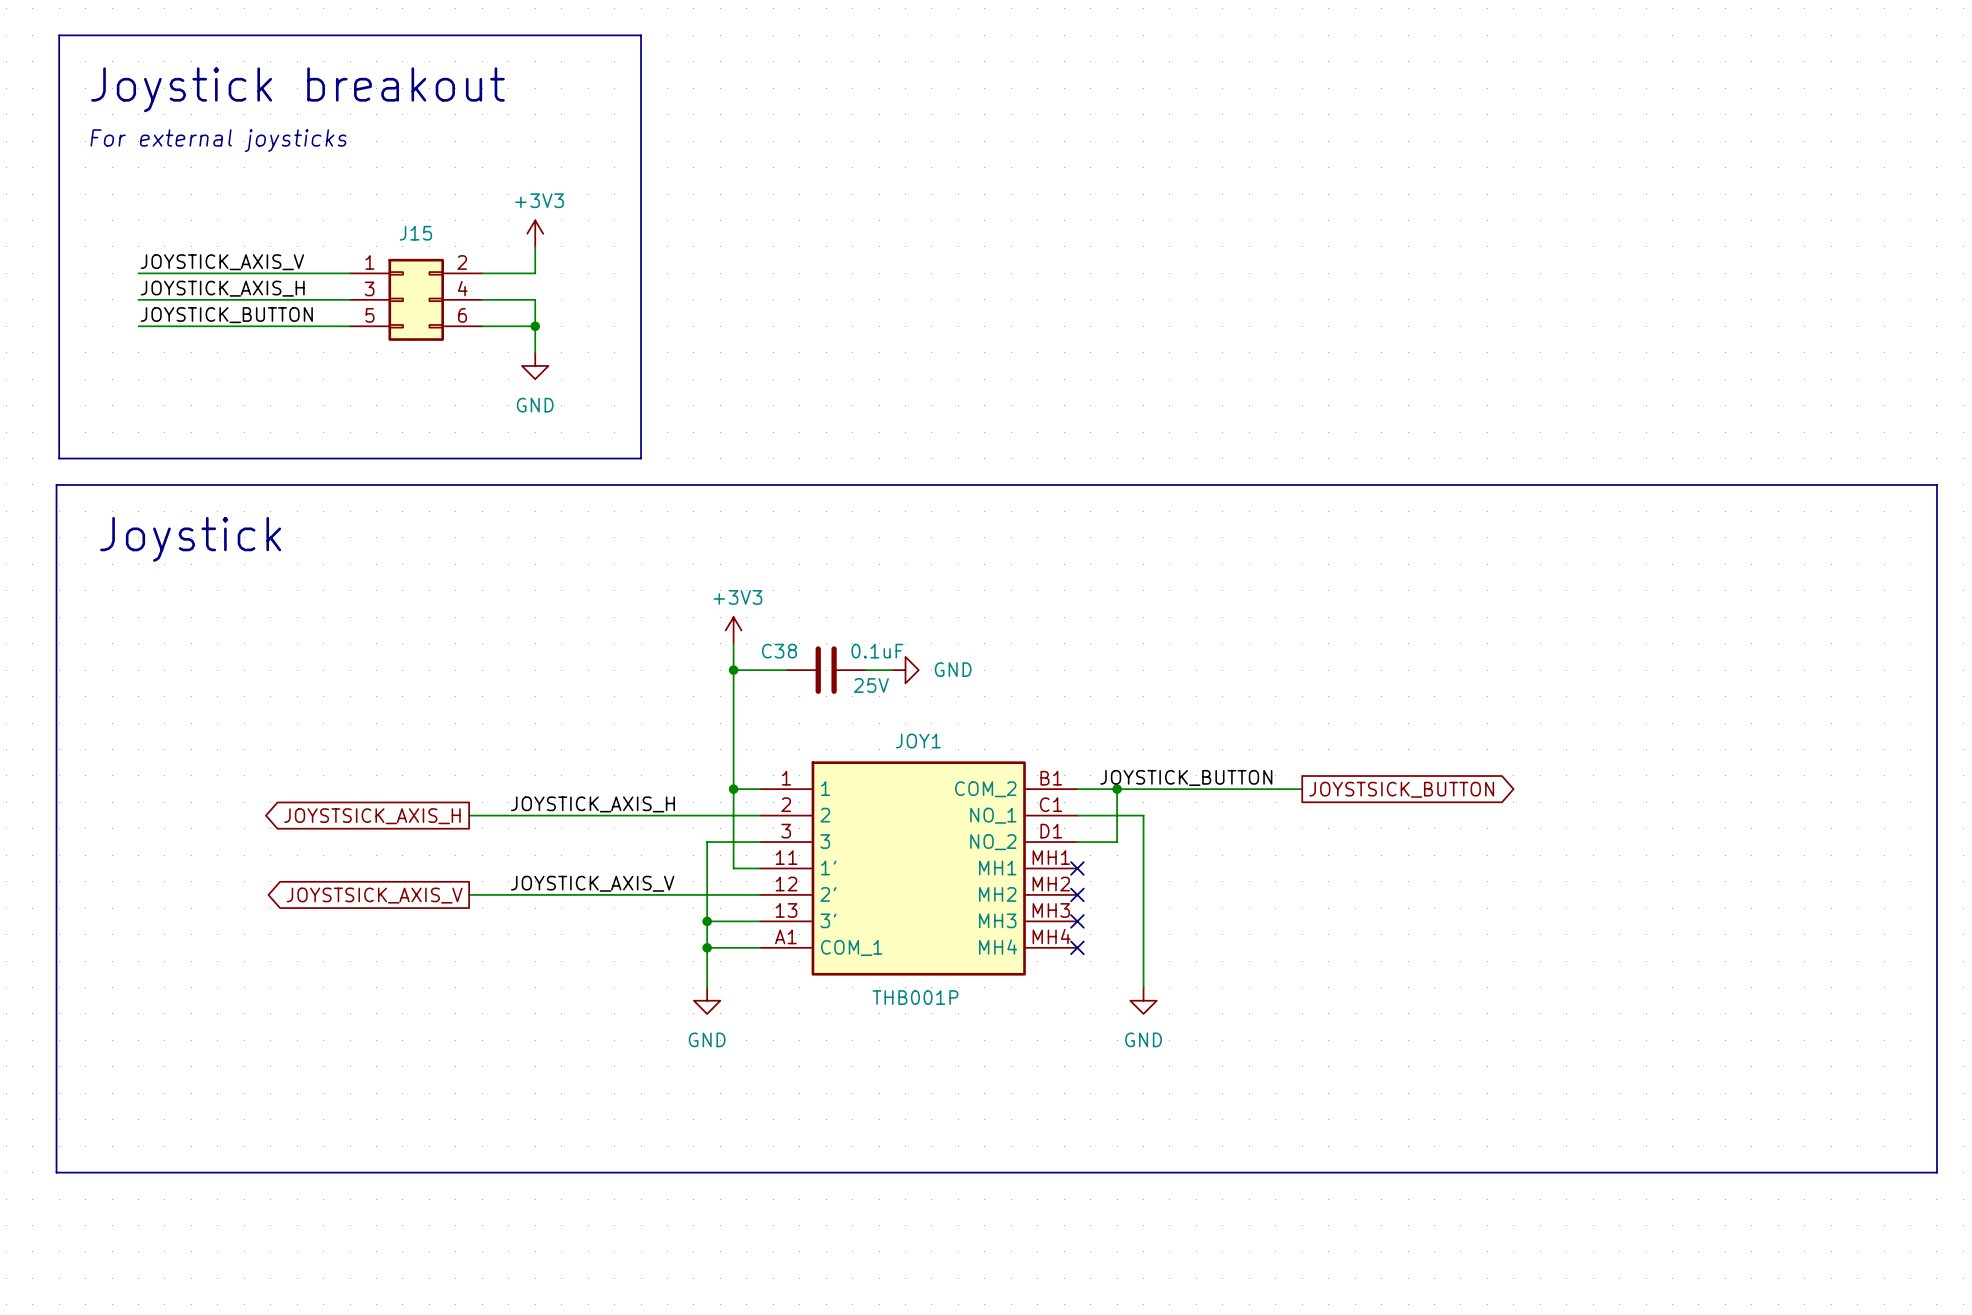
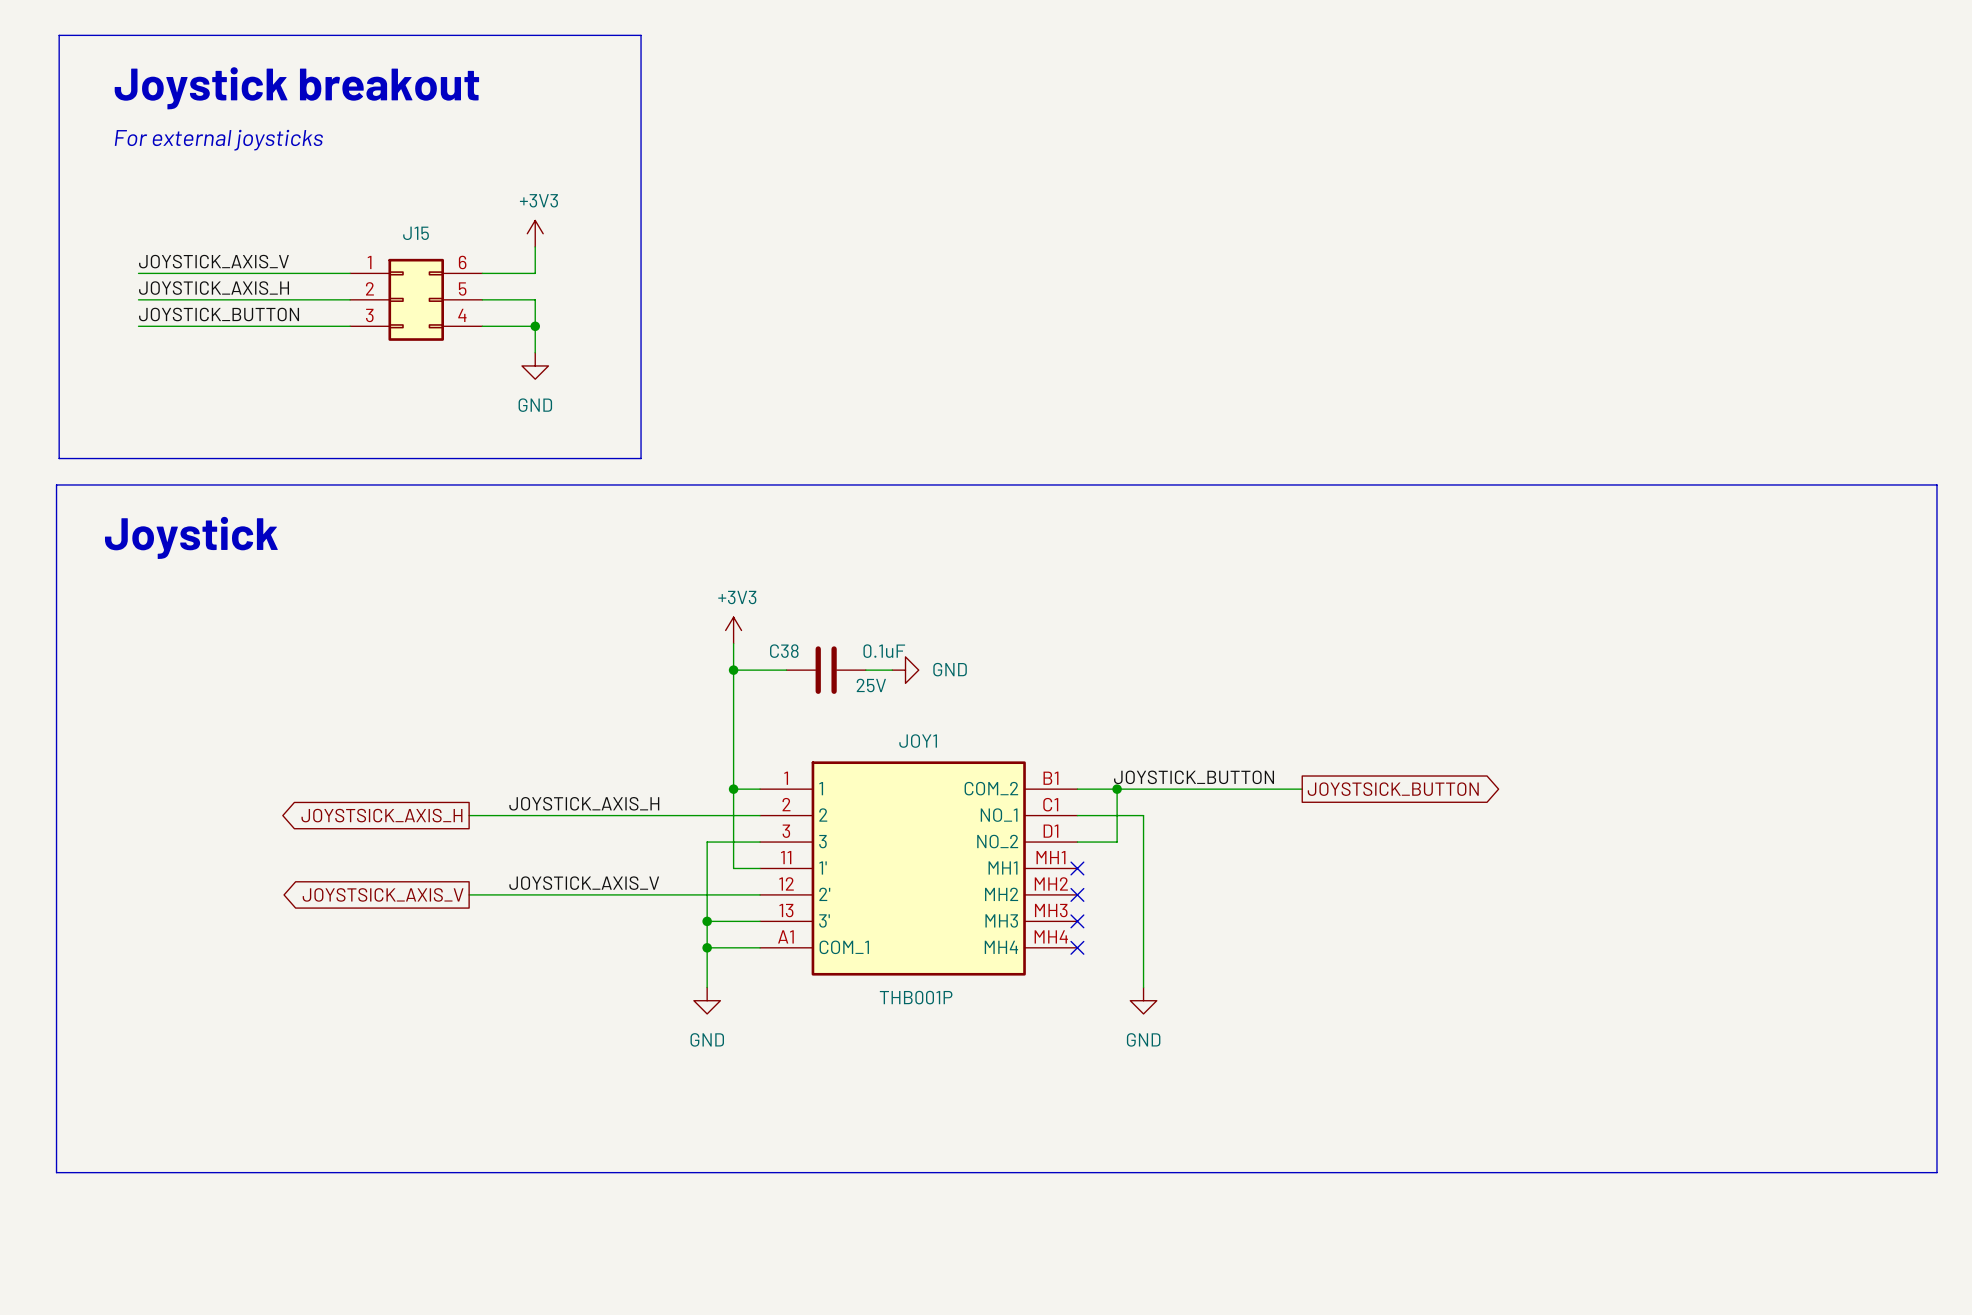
J15 pin number: 2 (462, 262) -> 6 (462, 262)
J15 pin number: 3 (369, 288) -> 2 (369, 288)
J15 pin number: 4 (462, 288) -> 5 (462, 289)
J15 pin number: 5 (369, 315) -> 3 (369, 315)
J15 pin number: 6 (462, 315) -> 4 (462, 315)

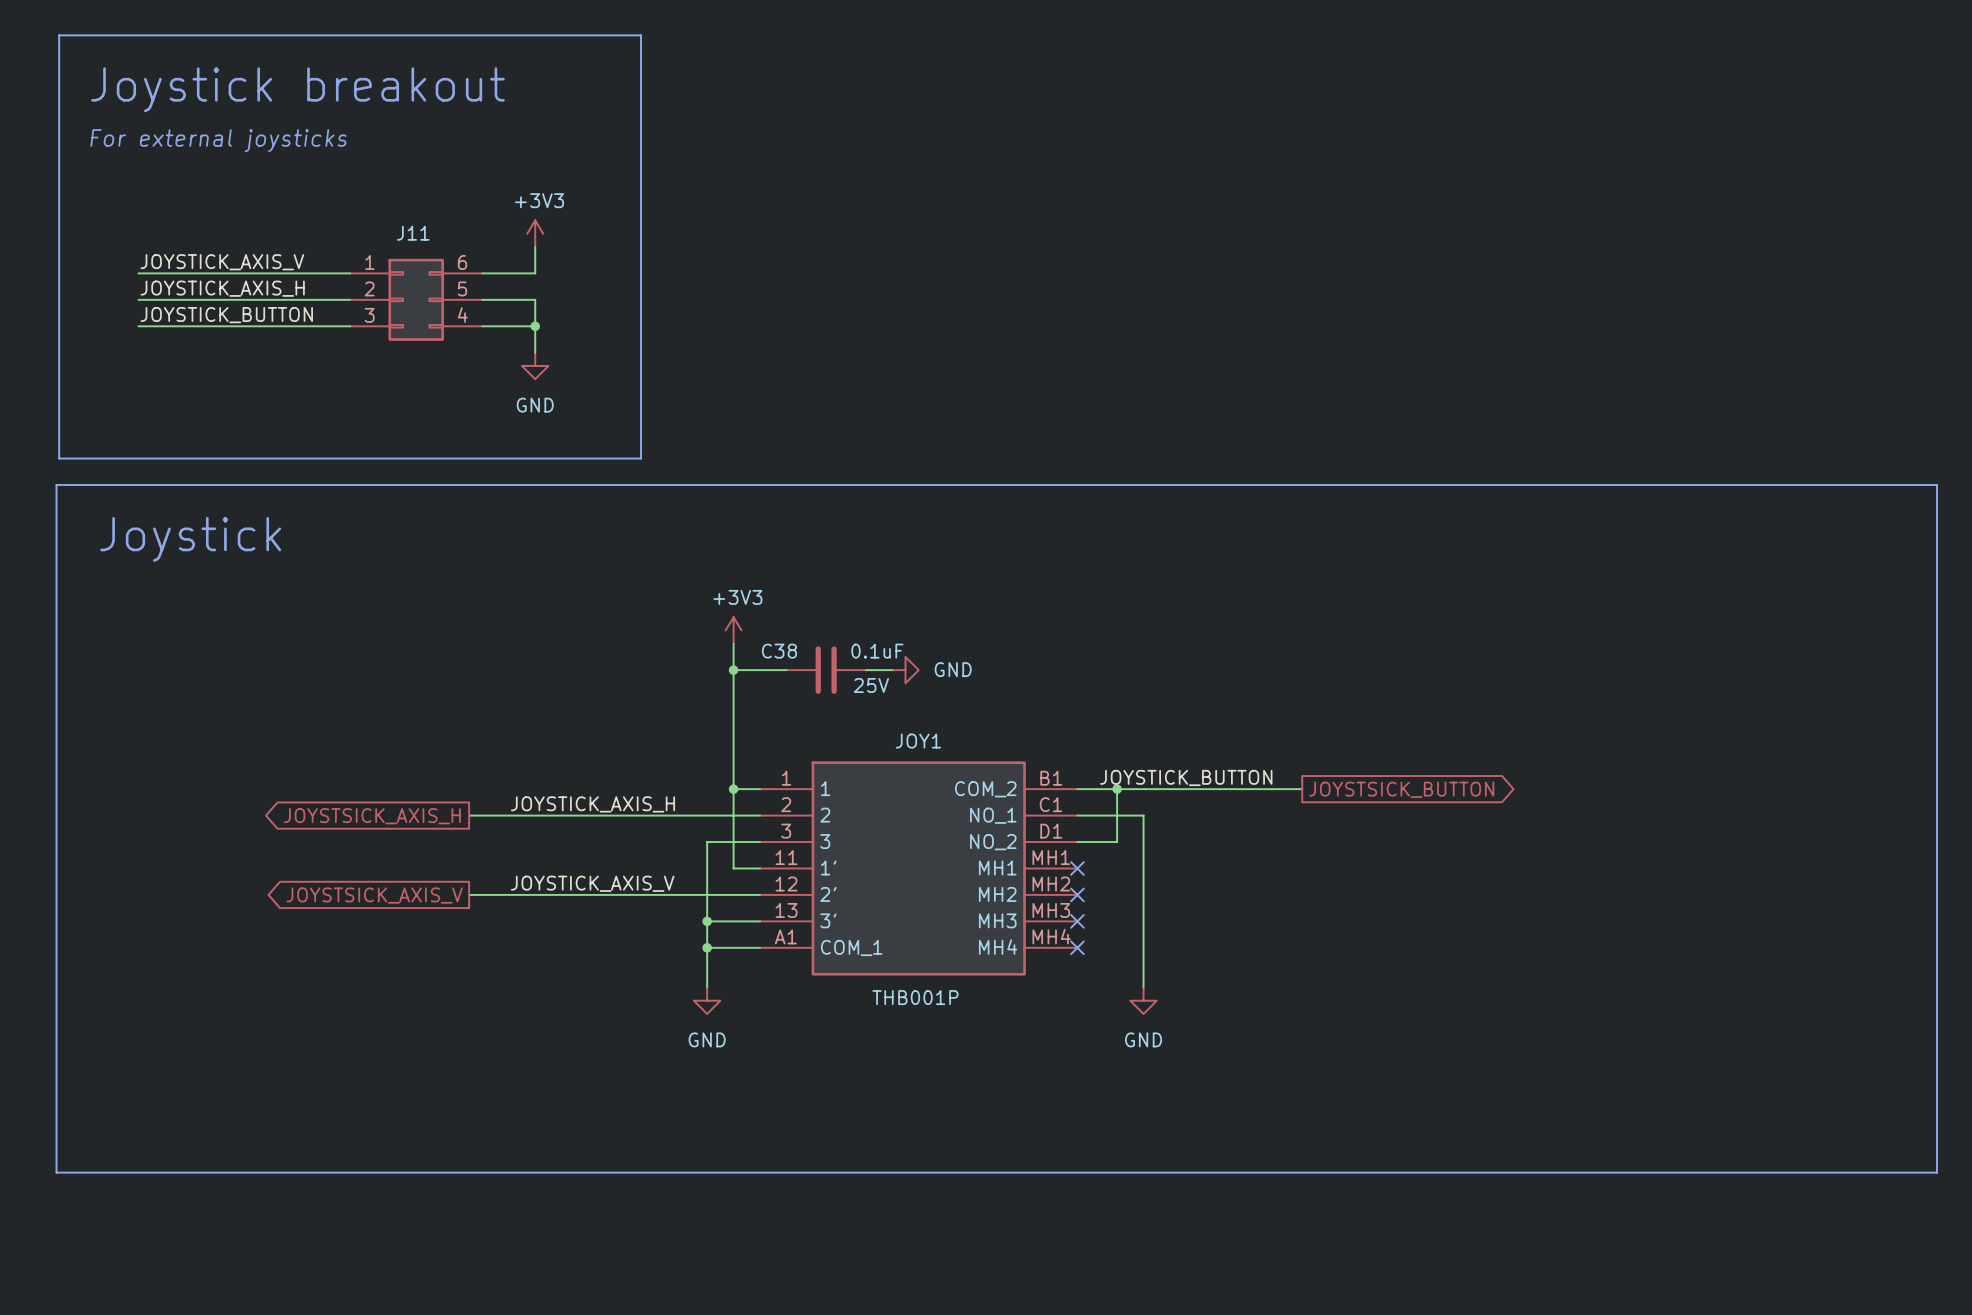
J15 name: J15 (416, 233) -> J11 (413, 233)

